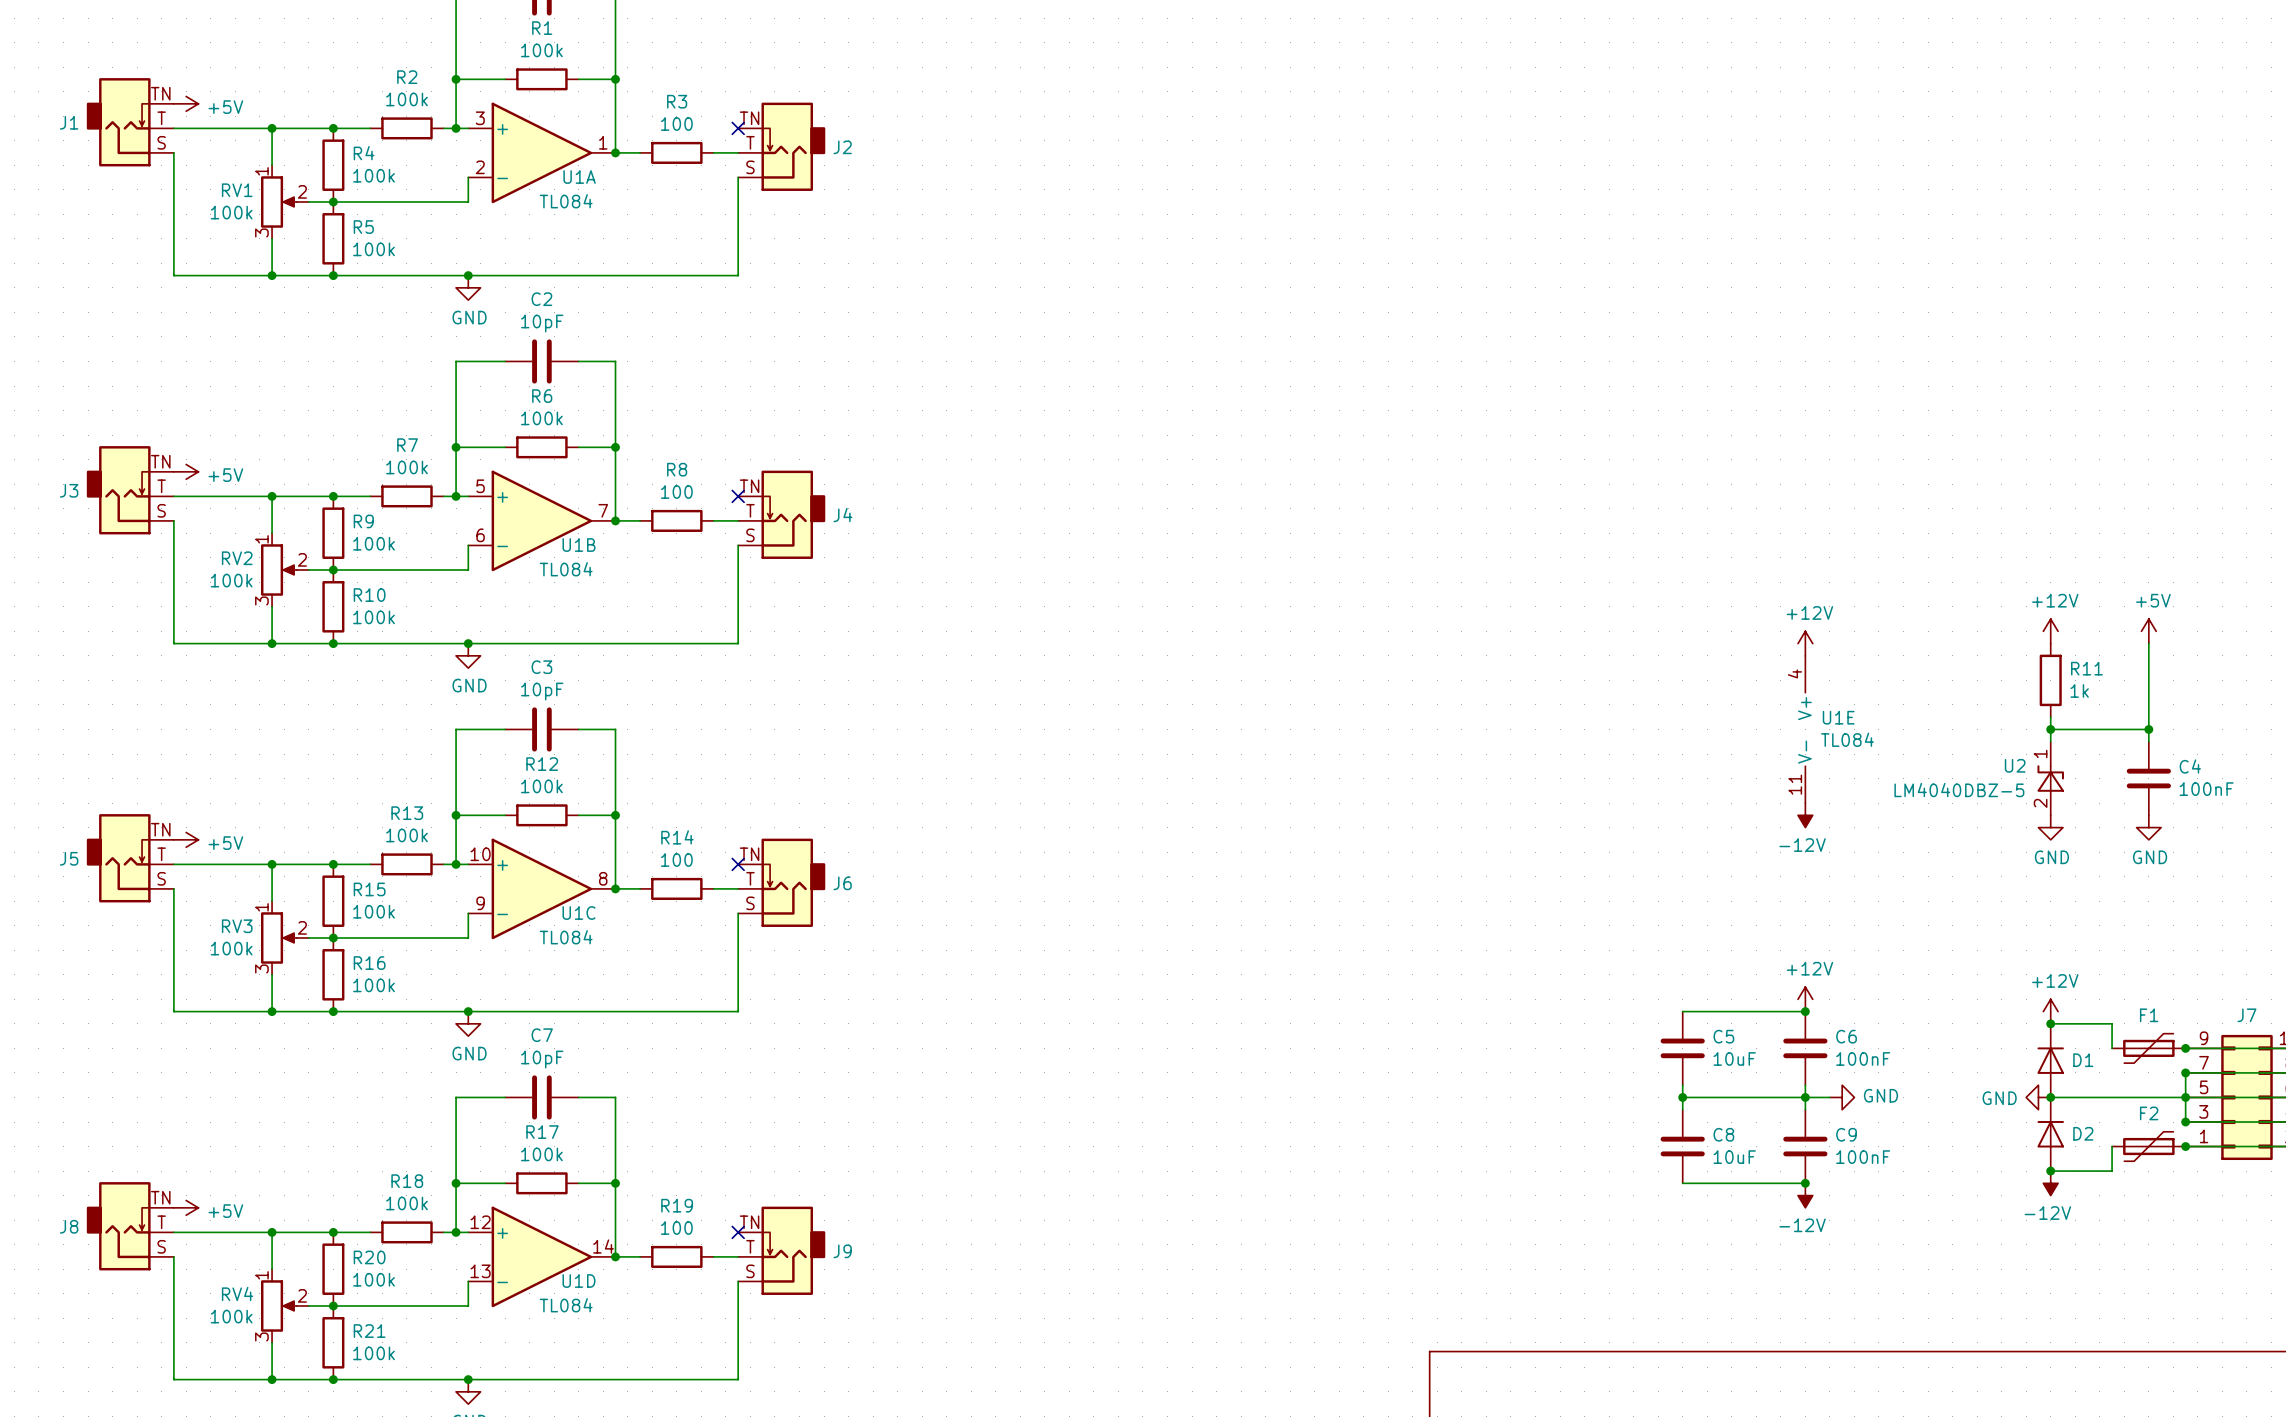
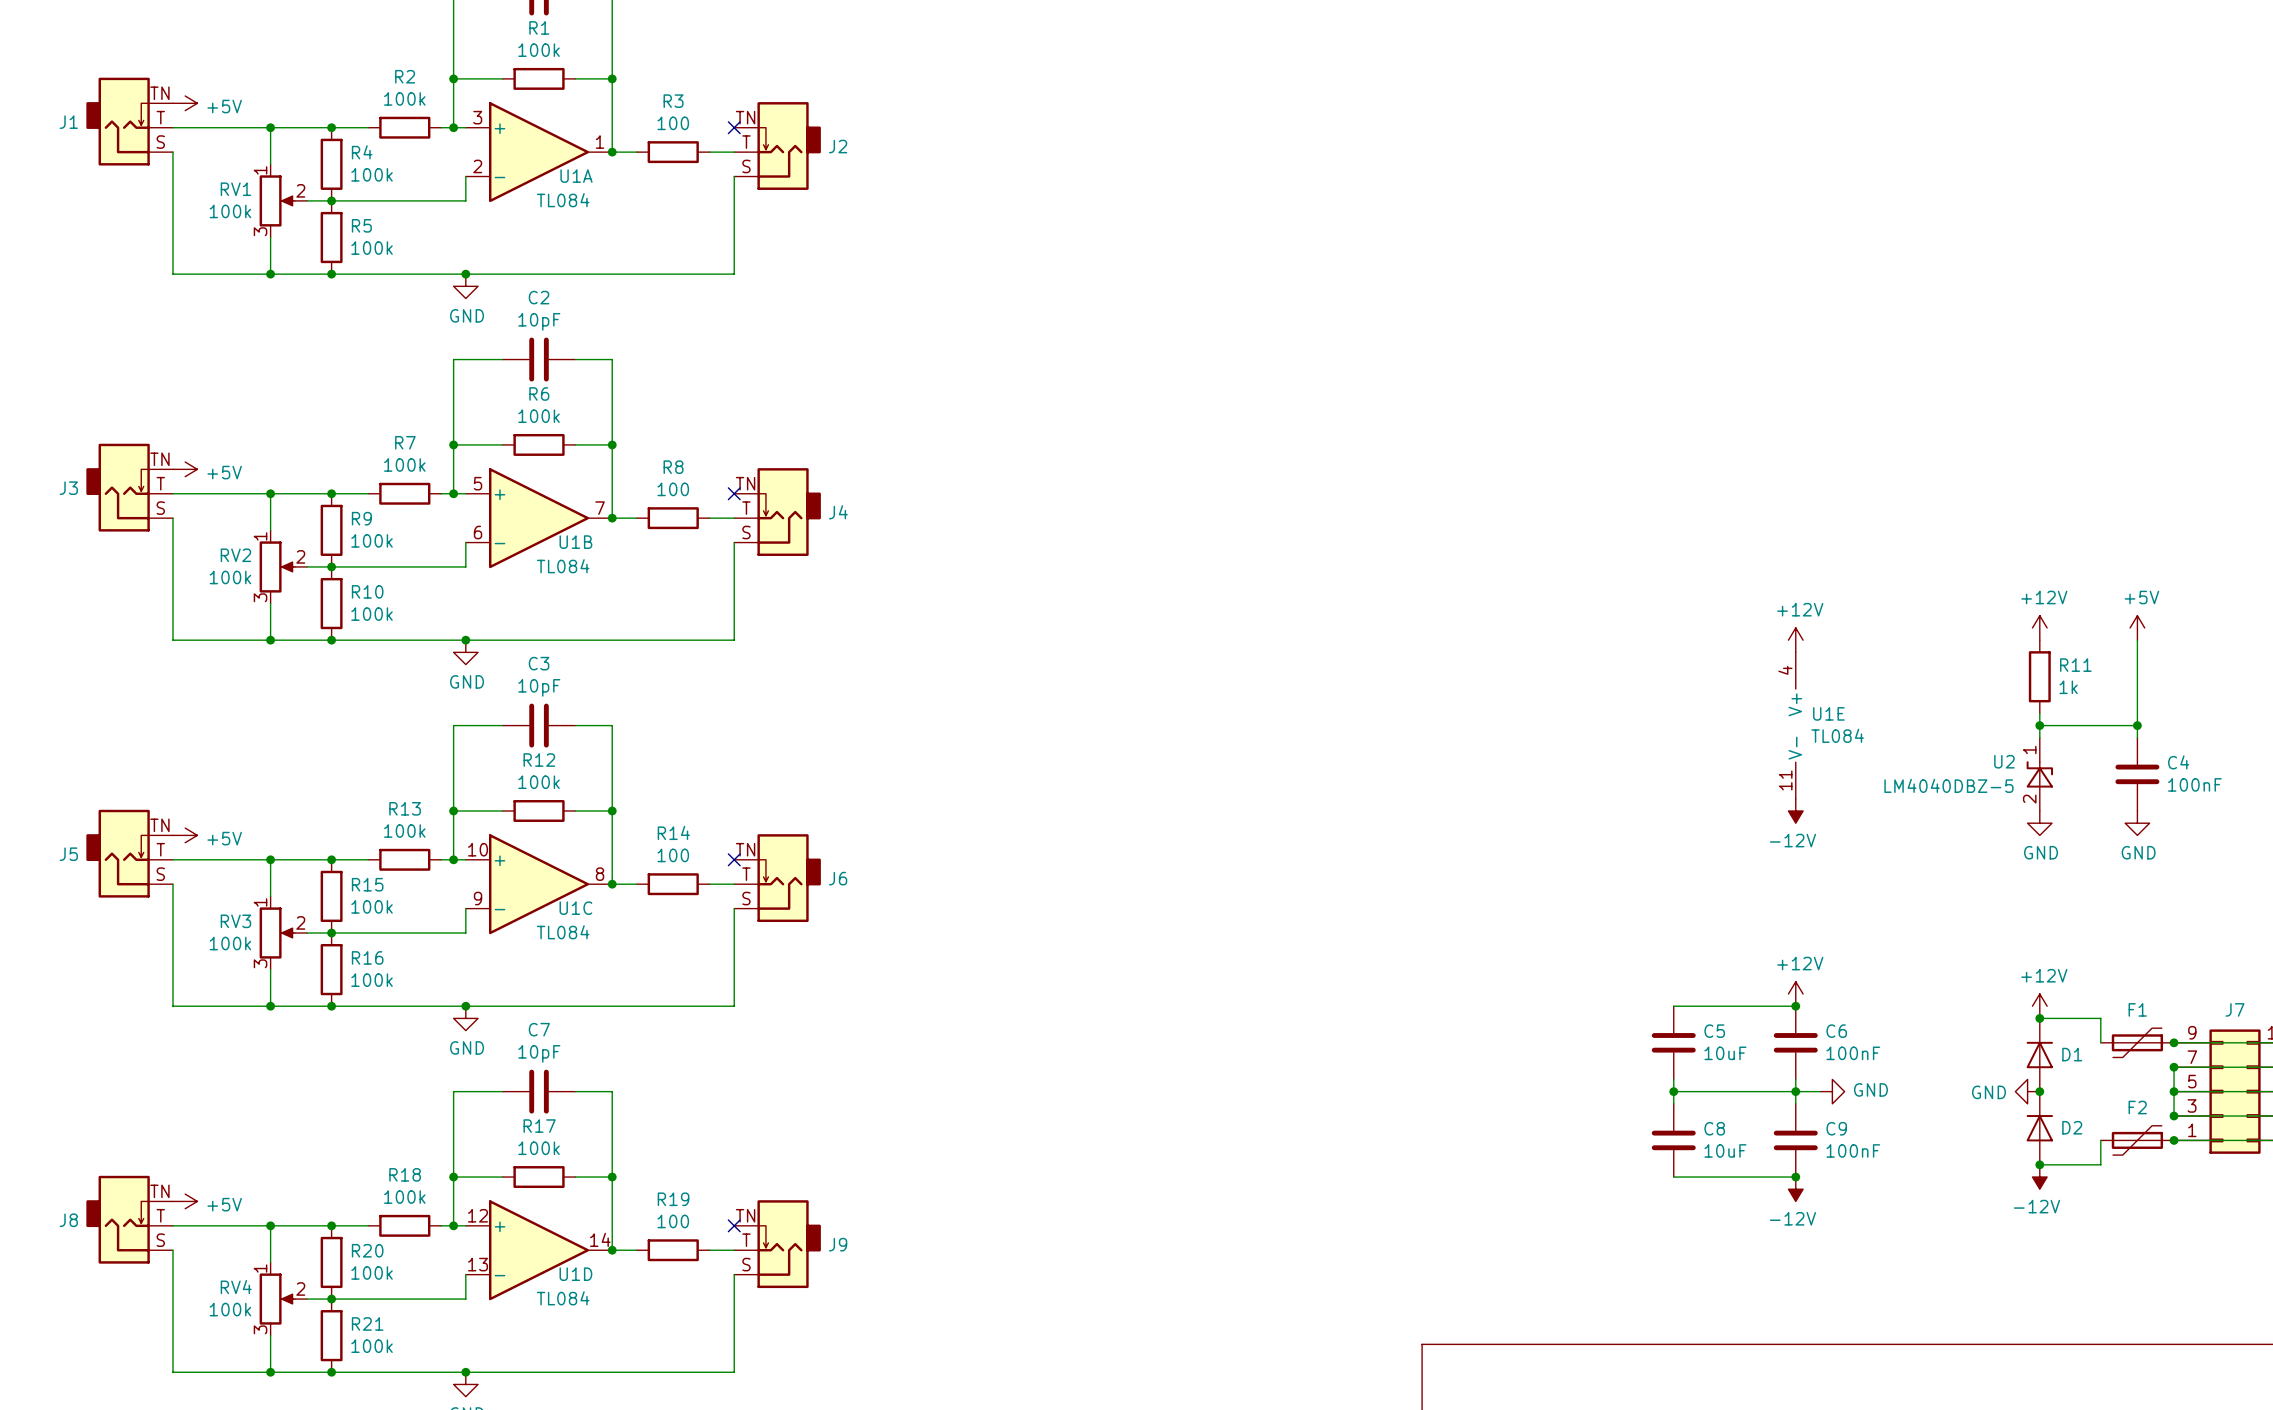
wire: (2050, 1097) (2185, 1097) -> none

